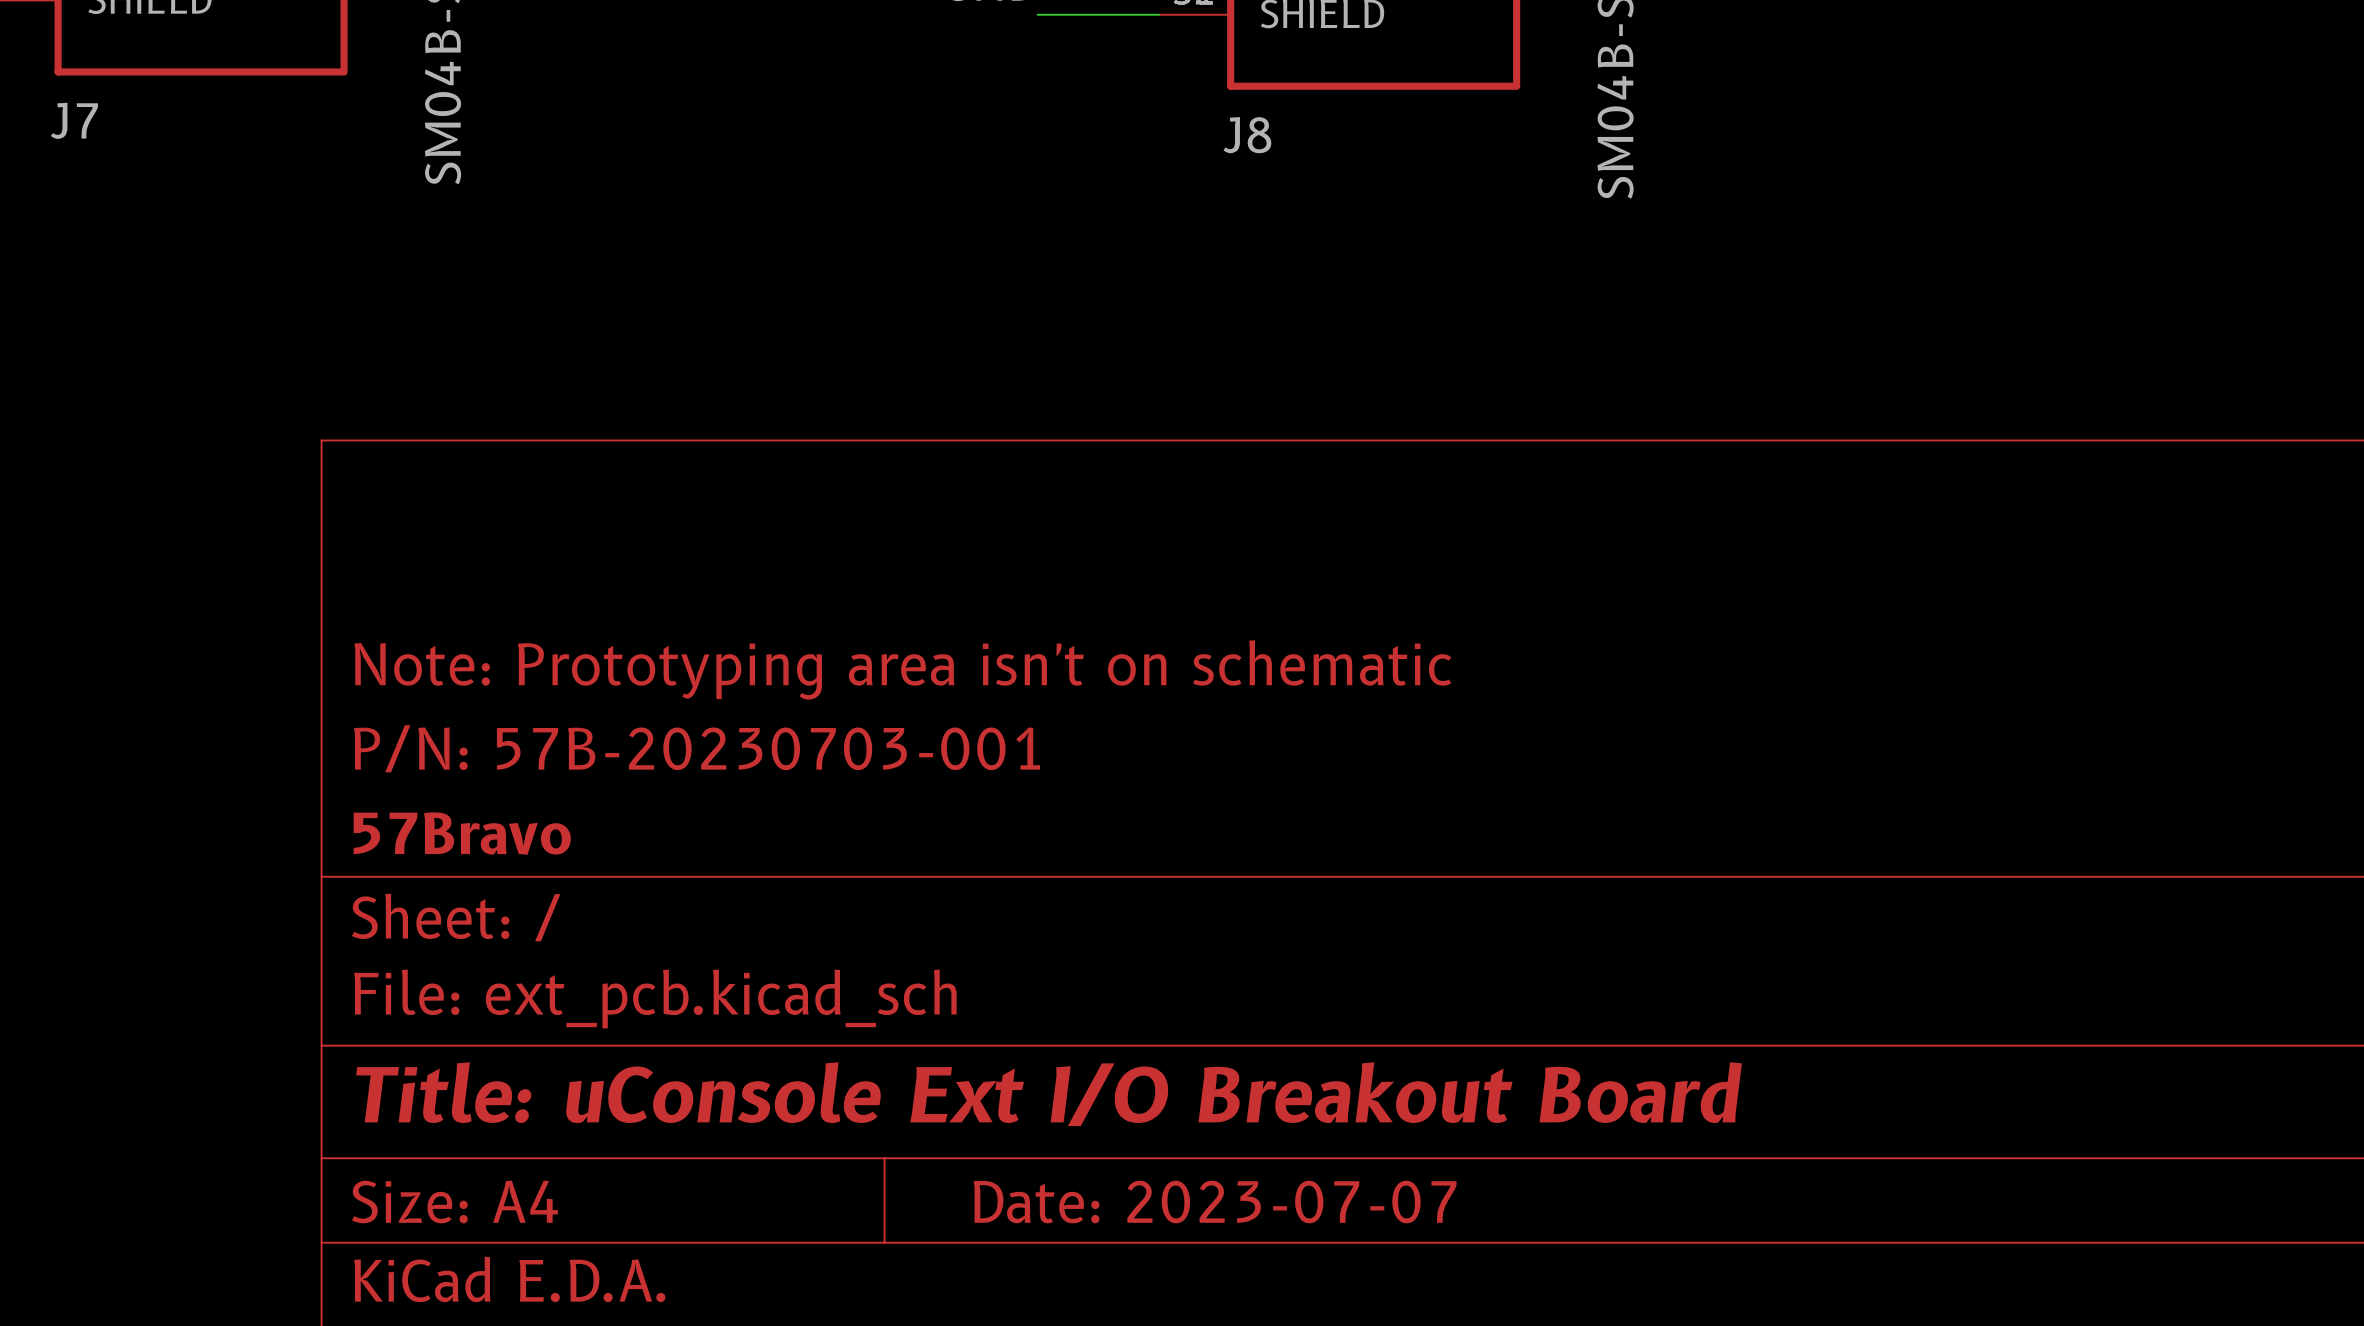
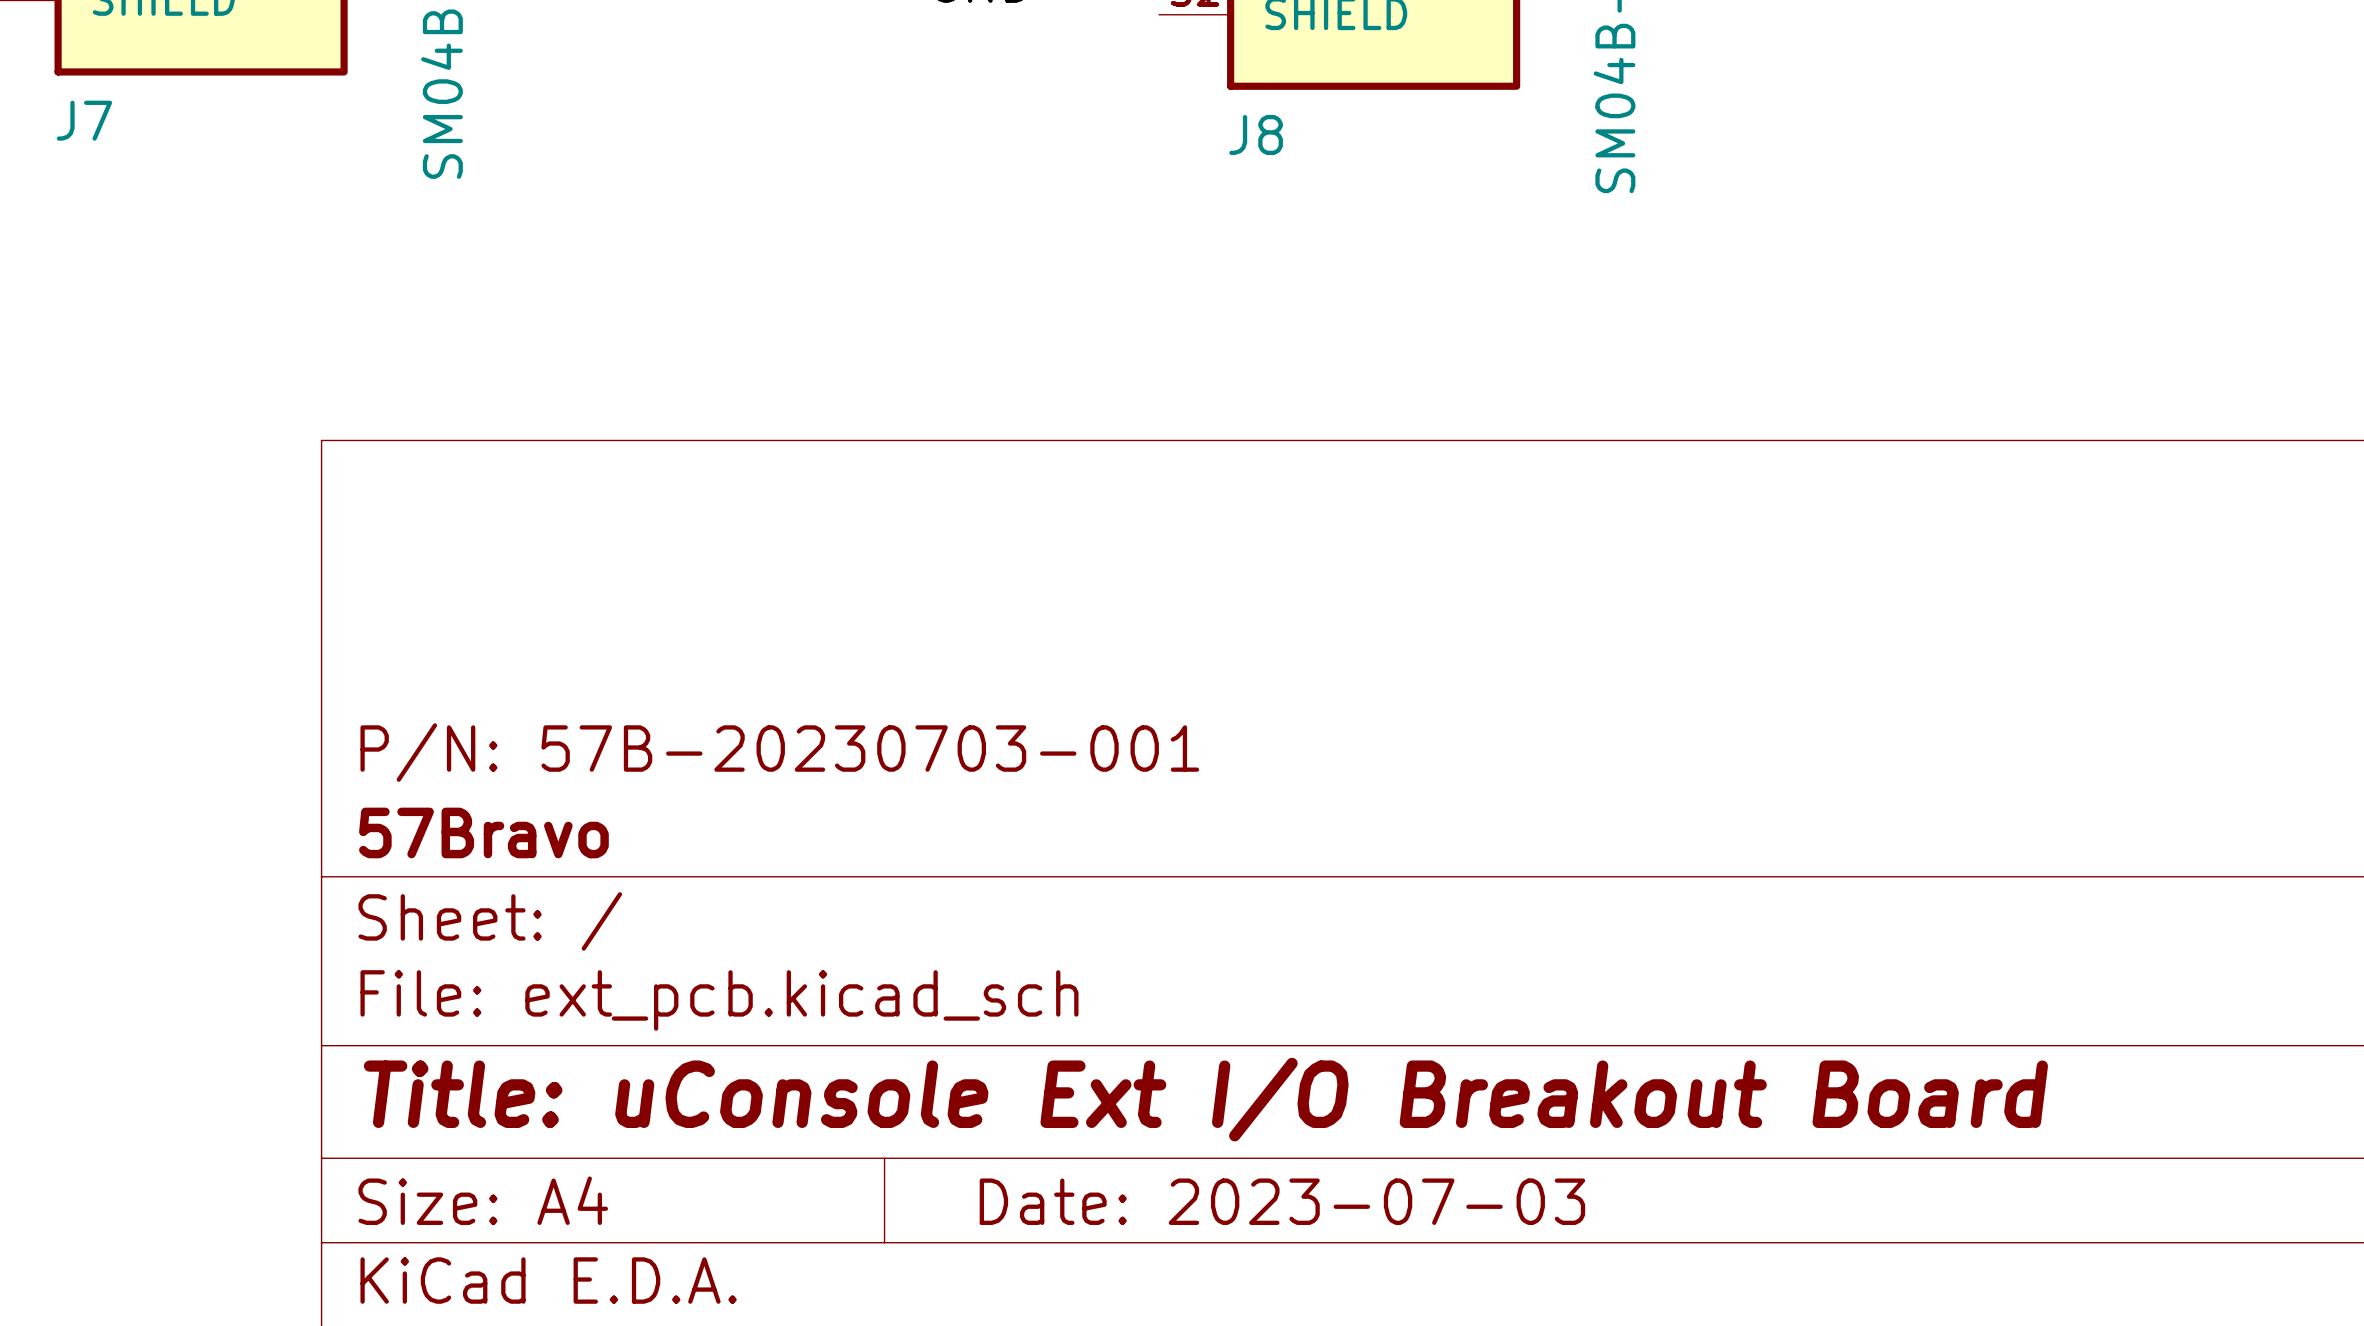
wire: (1037, 14) (1159, 14) -> none
title block: Note: Prototyping area isn't on schematic (902, 669) -> none
title block: Date: 2023-07-07 (1215, 1202) -> Date: 2023-07-03 (1282, 1201)

